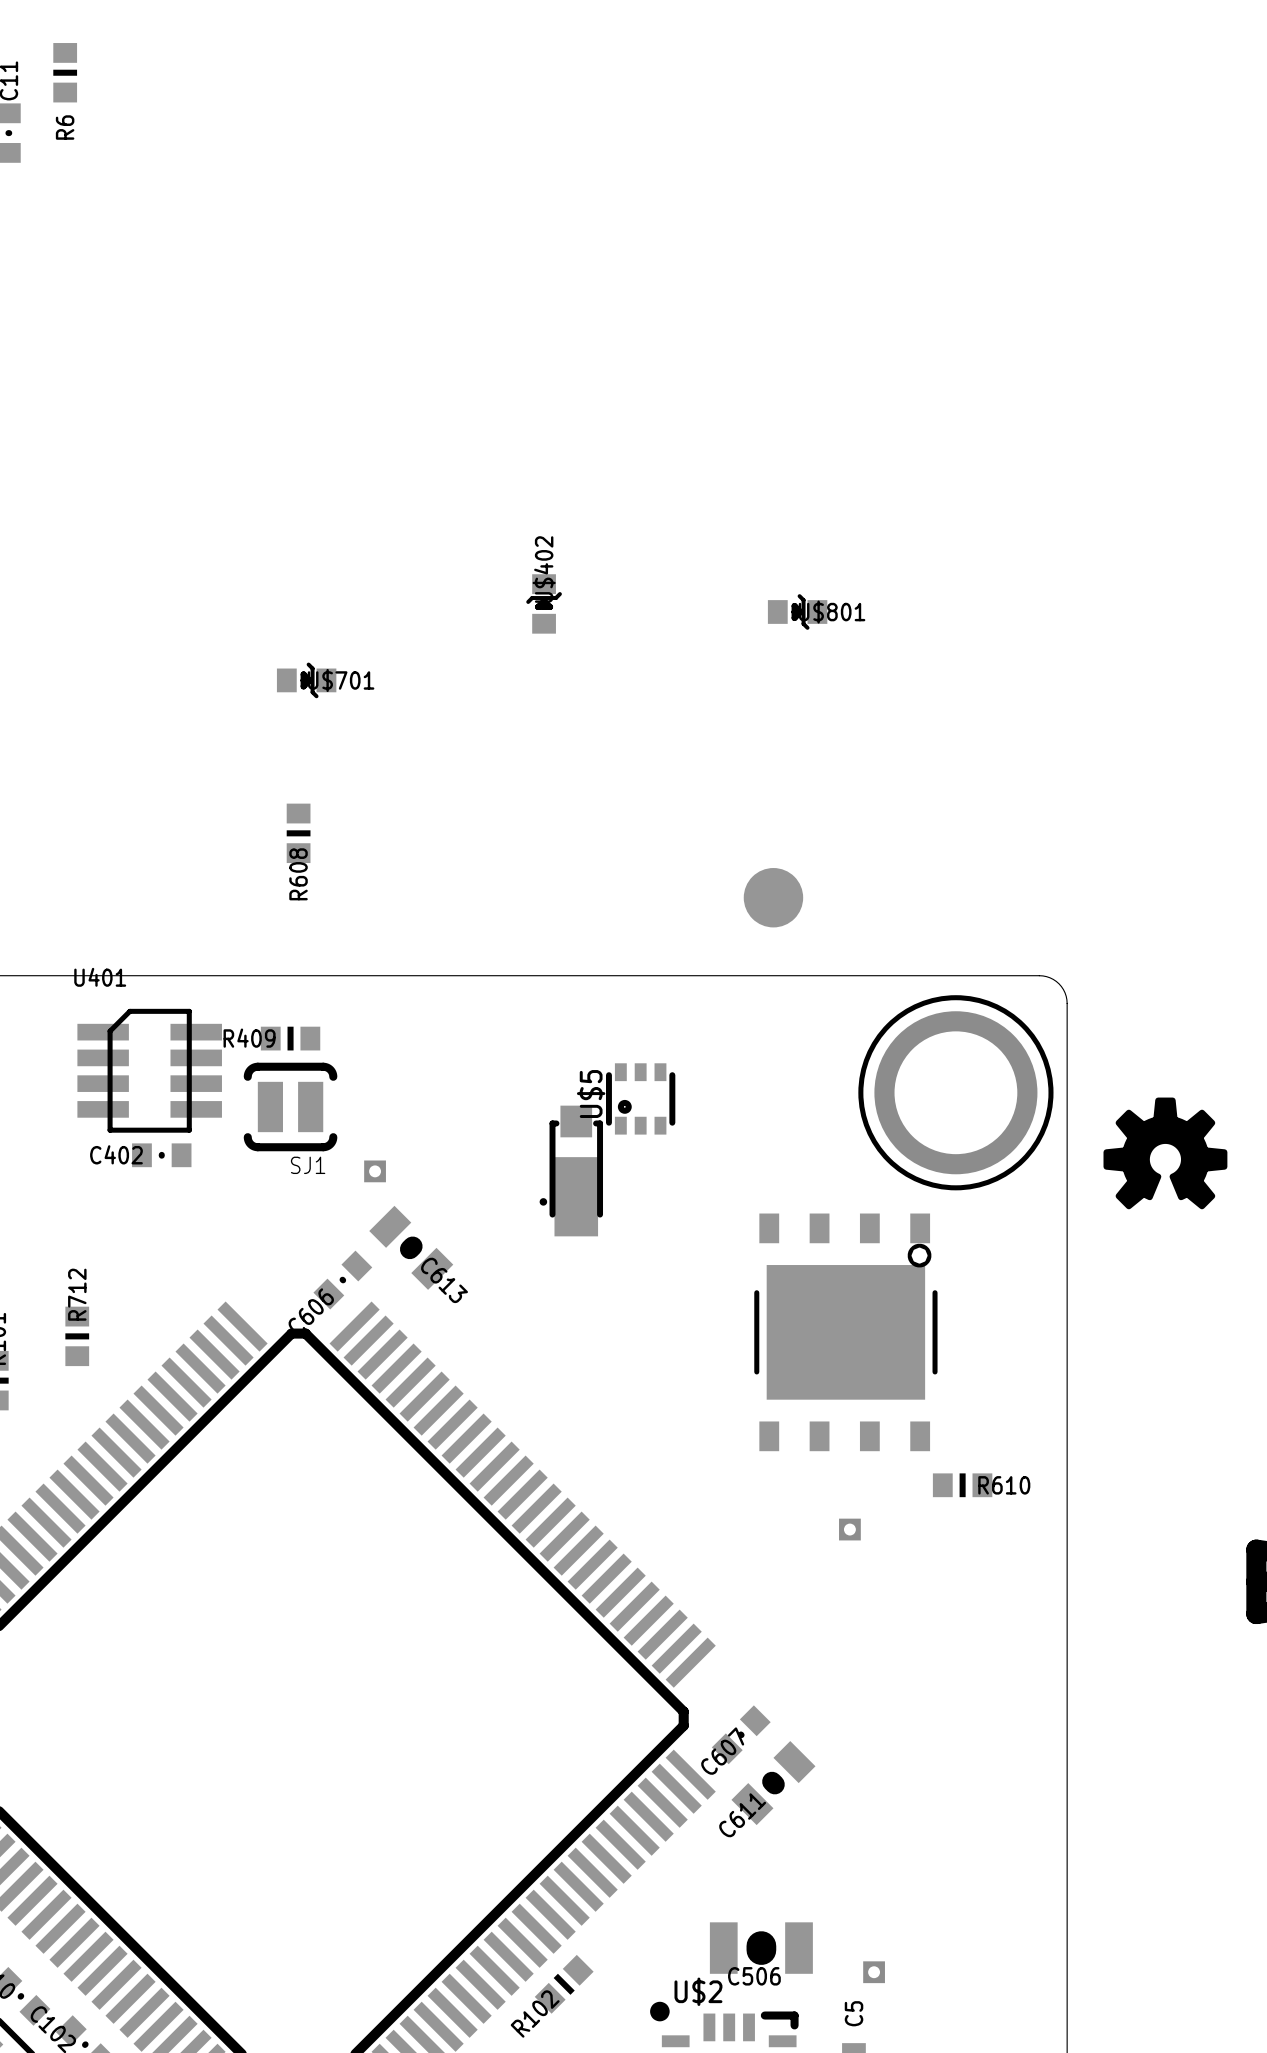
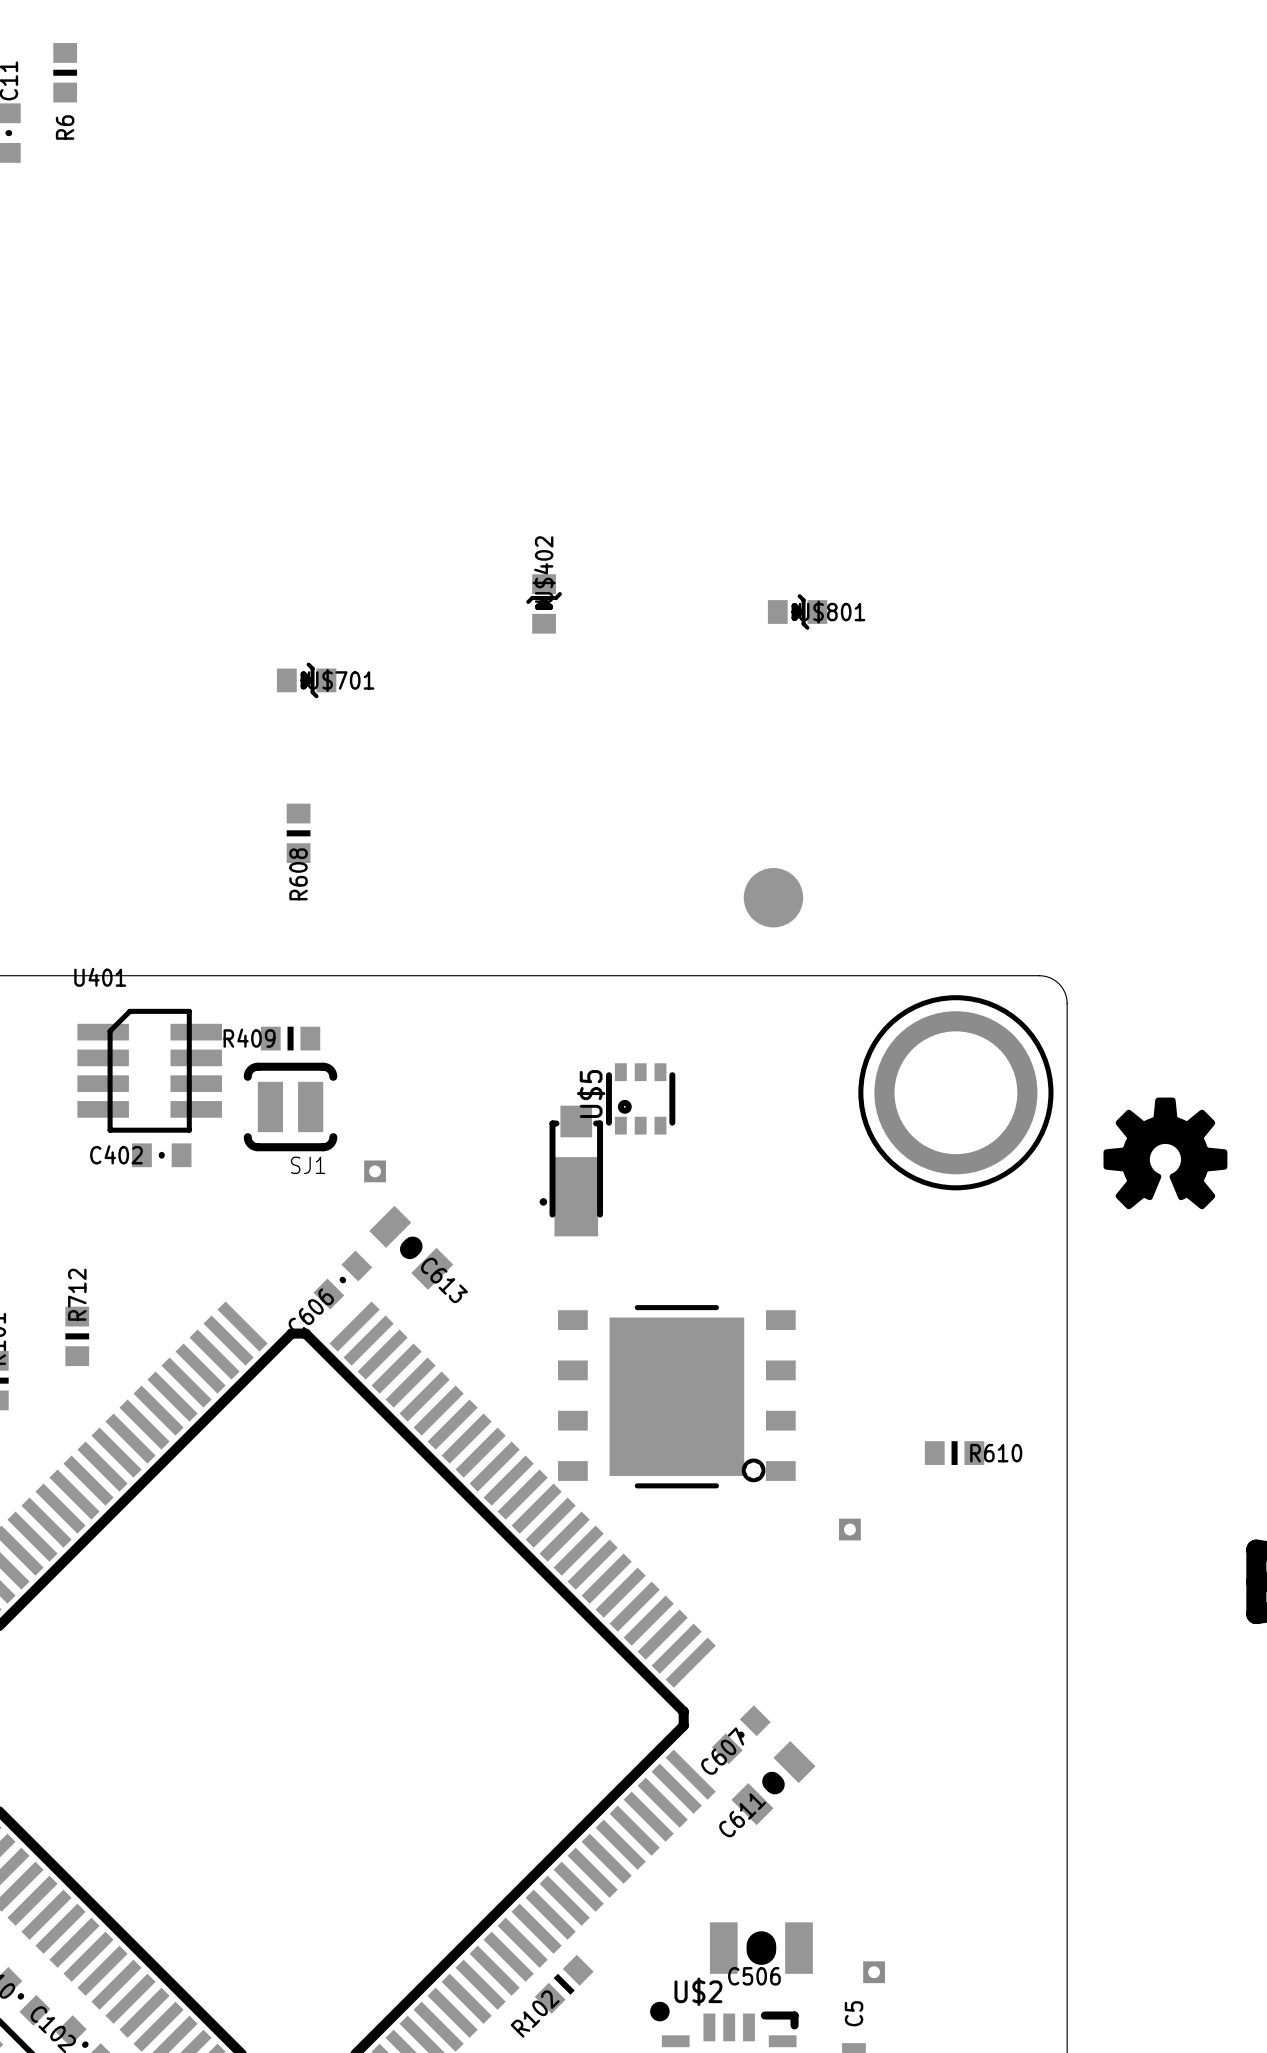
part rotation: 0° (845, 1332) -> 90° clockwise (676, 1396)
part position: (845, 1332) -> (676, 1396)
R610 position: (962, 1485) -> (954, 1453)

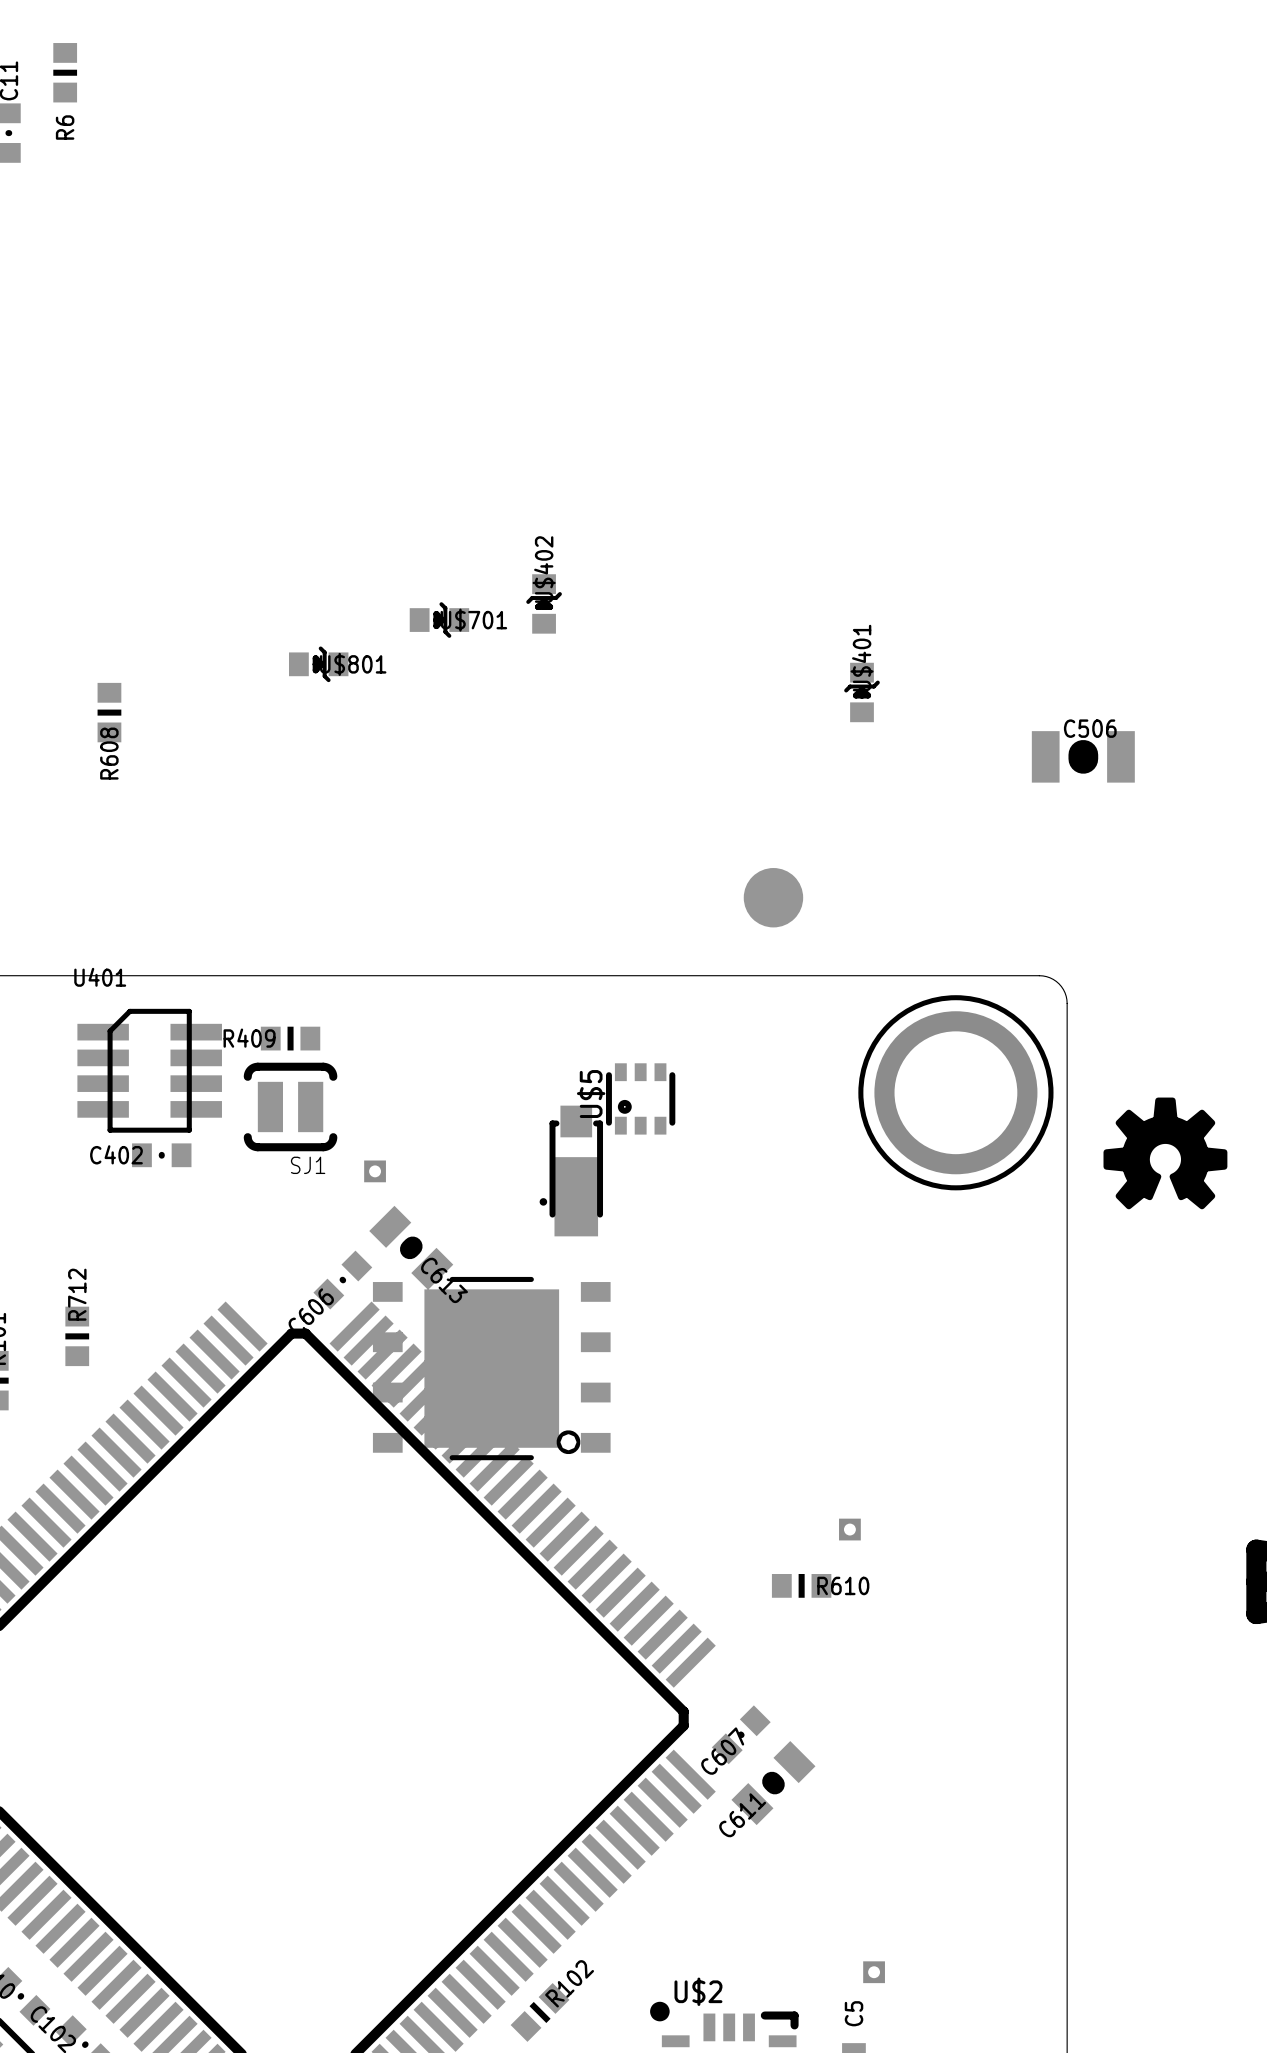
U$801 position: (797, 611) -> (318, 664)
U$701 position: (306, 680) -> (439, 620)
U$401: none -> (862, 692)
R608 position: (298, 833) -> (109, 712)
part position: (676, 1396) -> (491, 1368)
R610 position: (954, 1453) -> (801, 1585)
C506 position: (761, 1948) -> (1083, 756)
C506 name position: C506 (754, 1976) -> C506 (1090, 728)
R102 position: (564, 1984) -> (540, 2012)
R102 name position: R102 (535, 2013) -> R102 (569, 1983)

